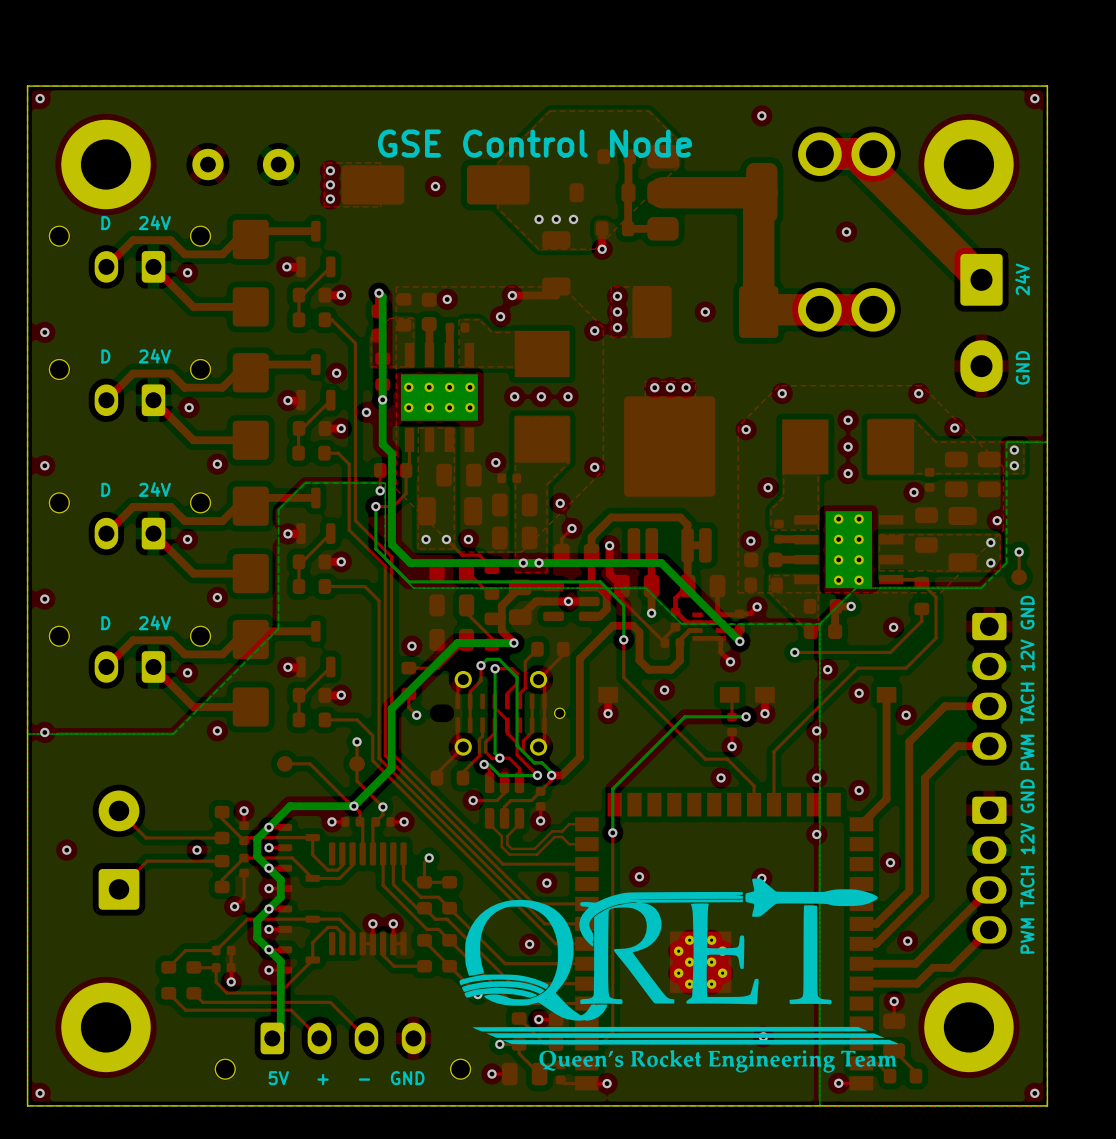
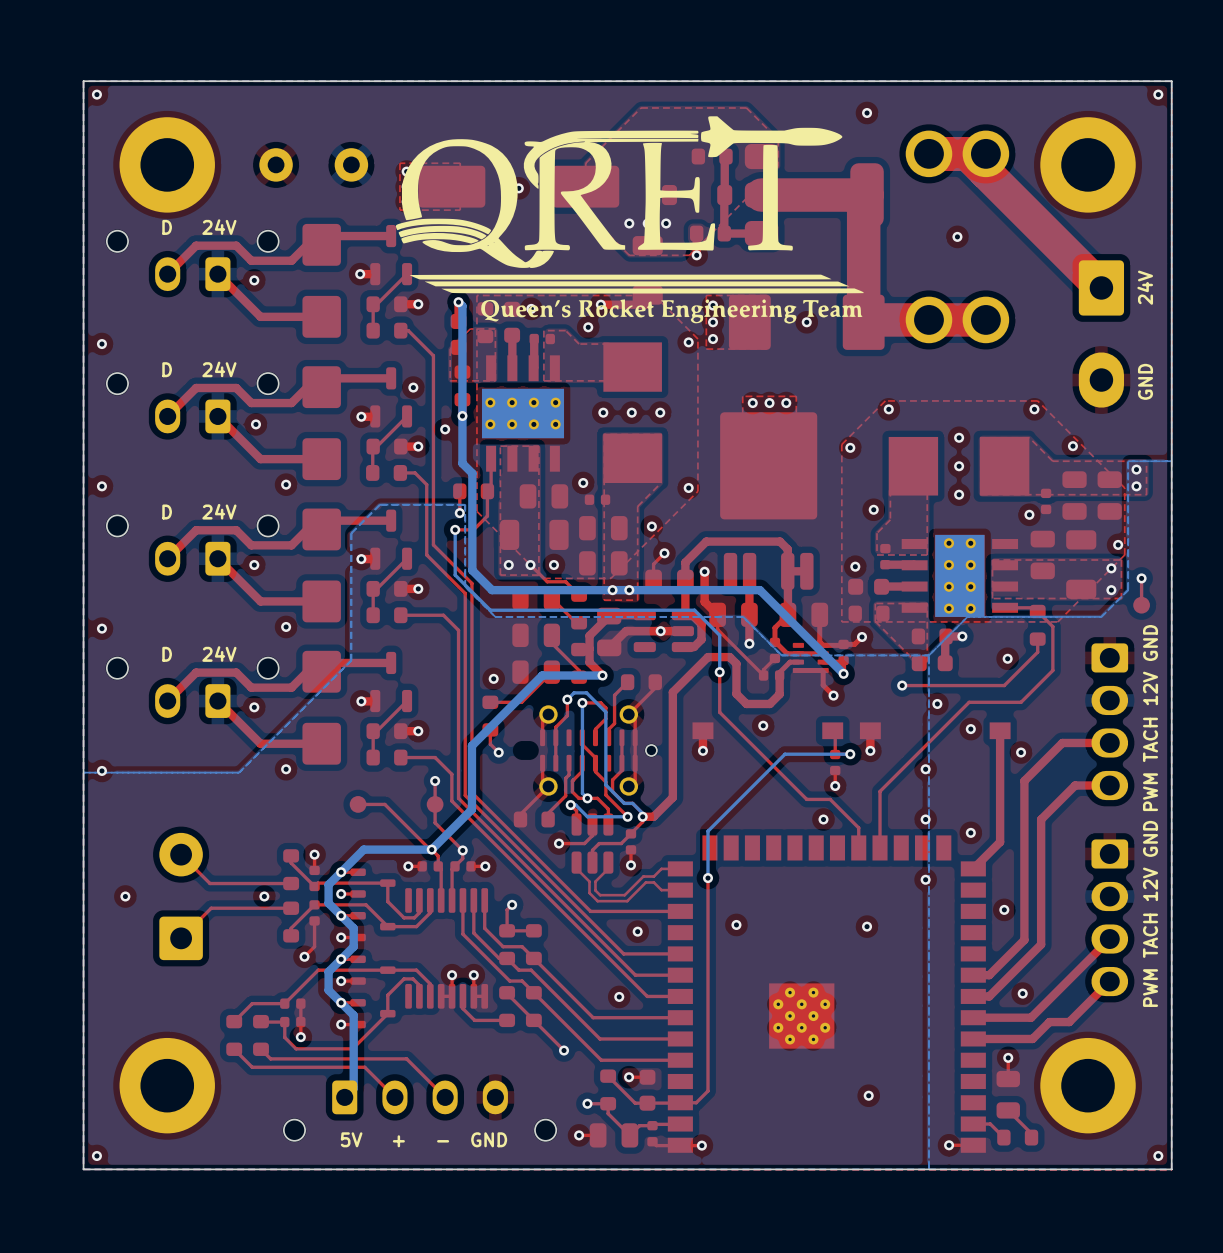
drawing: none -> [395, 116, 864, 324]
text: GSE Control Node (534, 143) -> none
drawing: [459, 878, 898, 1073] -> none

